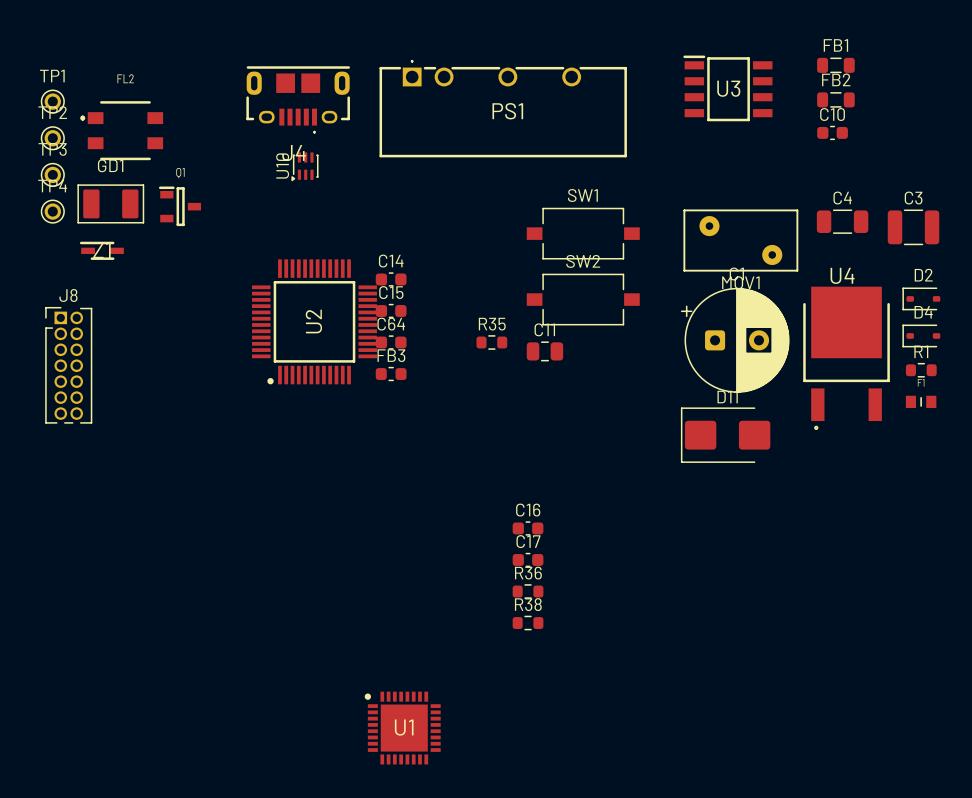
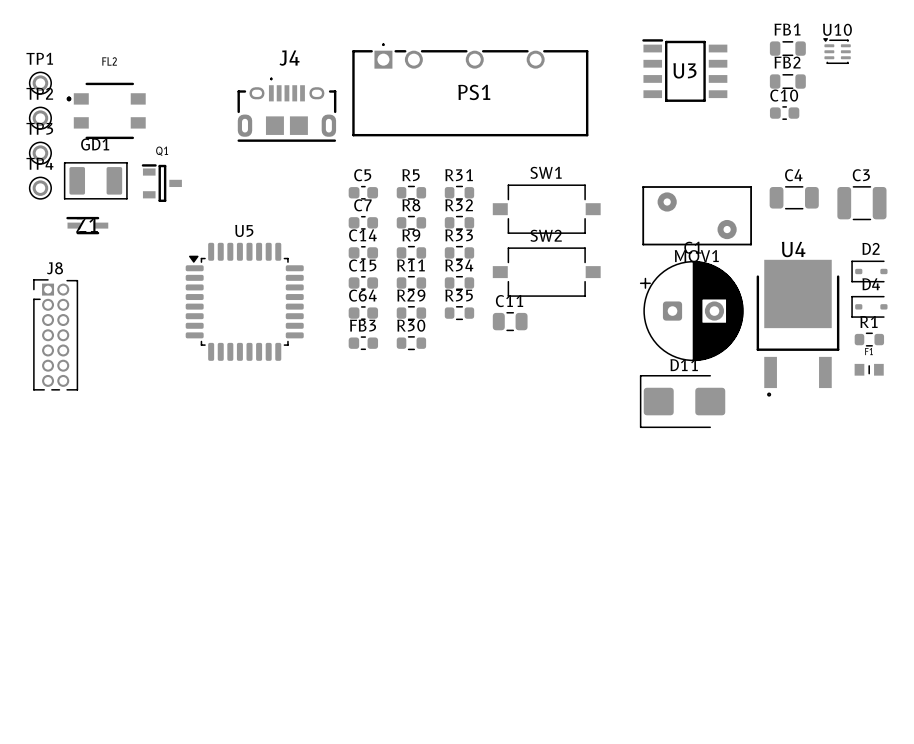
J4 rotation: 0° (298, 99) -> 180° (286, 109)
U10 rotation: 0° (304, 166) -> 90° clockwise (837, 51)
U10 position: (304, 166) -> (837, 51)
C5: none -> (363, 192)
R5: none -> (411, 192)
R31: none -> (459, 192)
C7: none -> (363, 222)
R8: none -> (411, 222)
R32: none -> (459, 222)
R9: none -> (411, 252)
R33: none -> (459, 252)
R11: none -> (411, 283)
R34: none -> (459, 283)
U2: (314, 321) -> none
U5: none -> (244, 301)
R29: none -> (411, 313)
R30: none -> (411, 343)
C16: (528, 528) -> none
C17: (528, 559) -> none
R36: (528, 591) -> none
R38: (528, 623) -> none
U1: (402, 728) -> none

